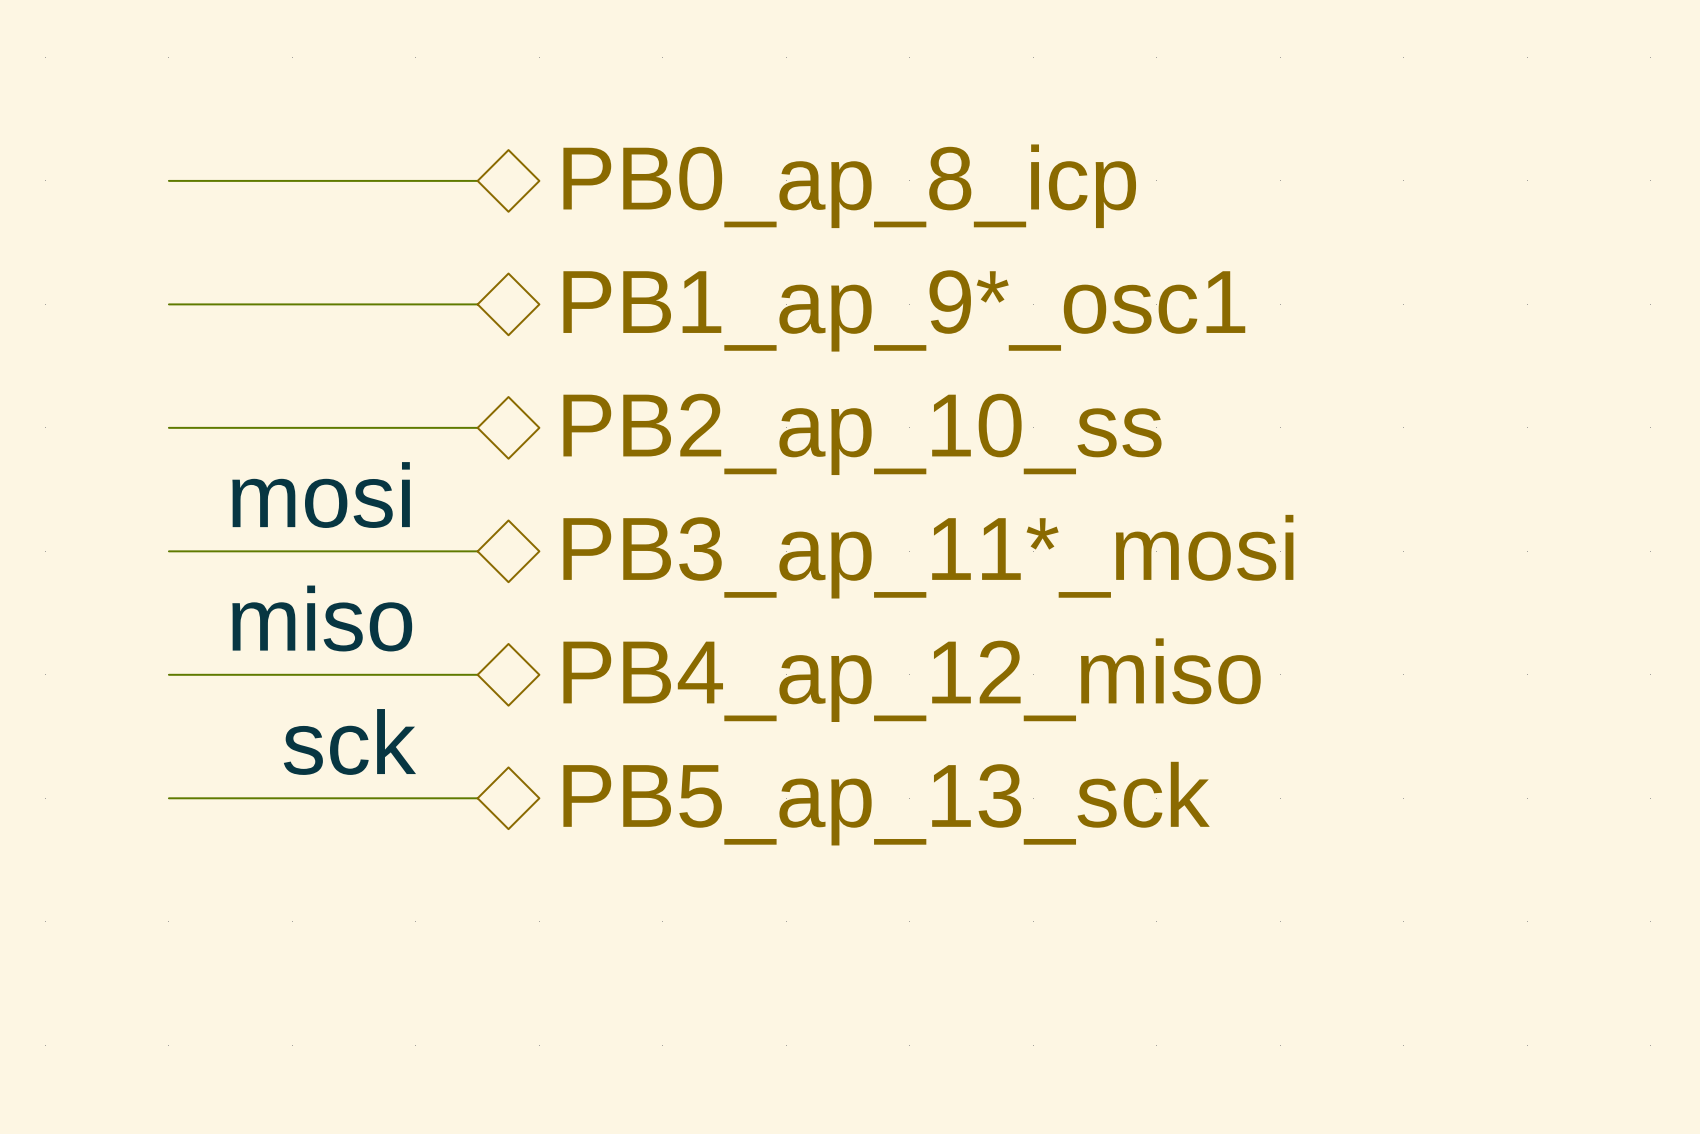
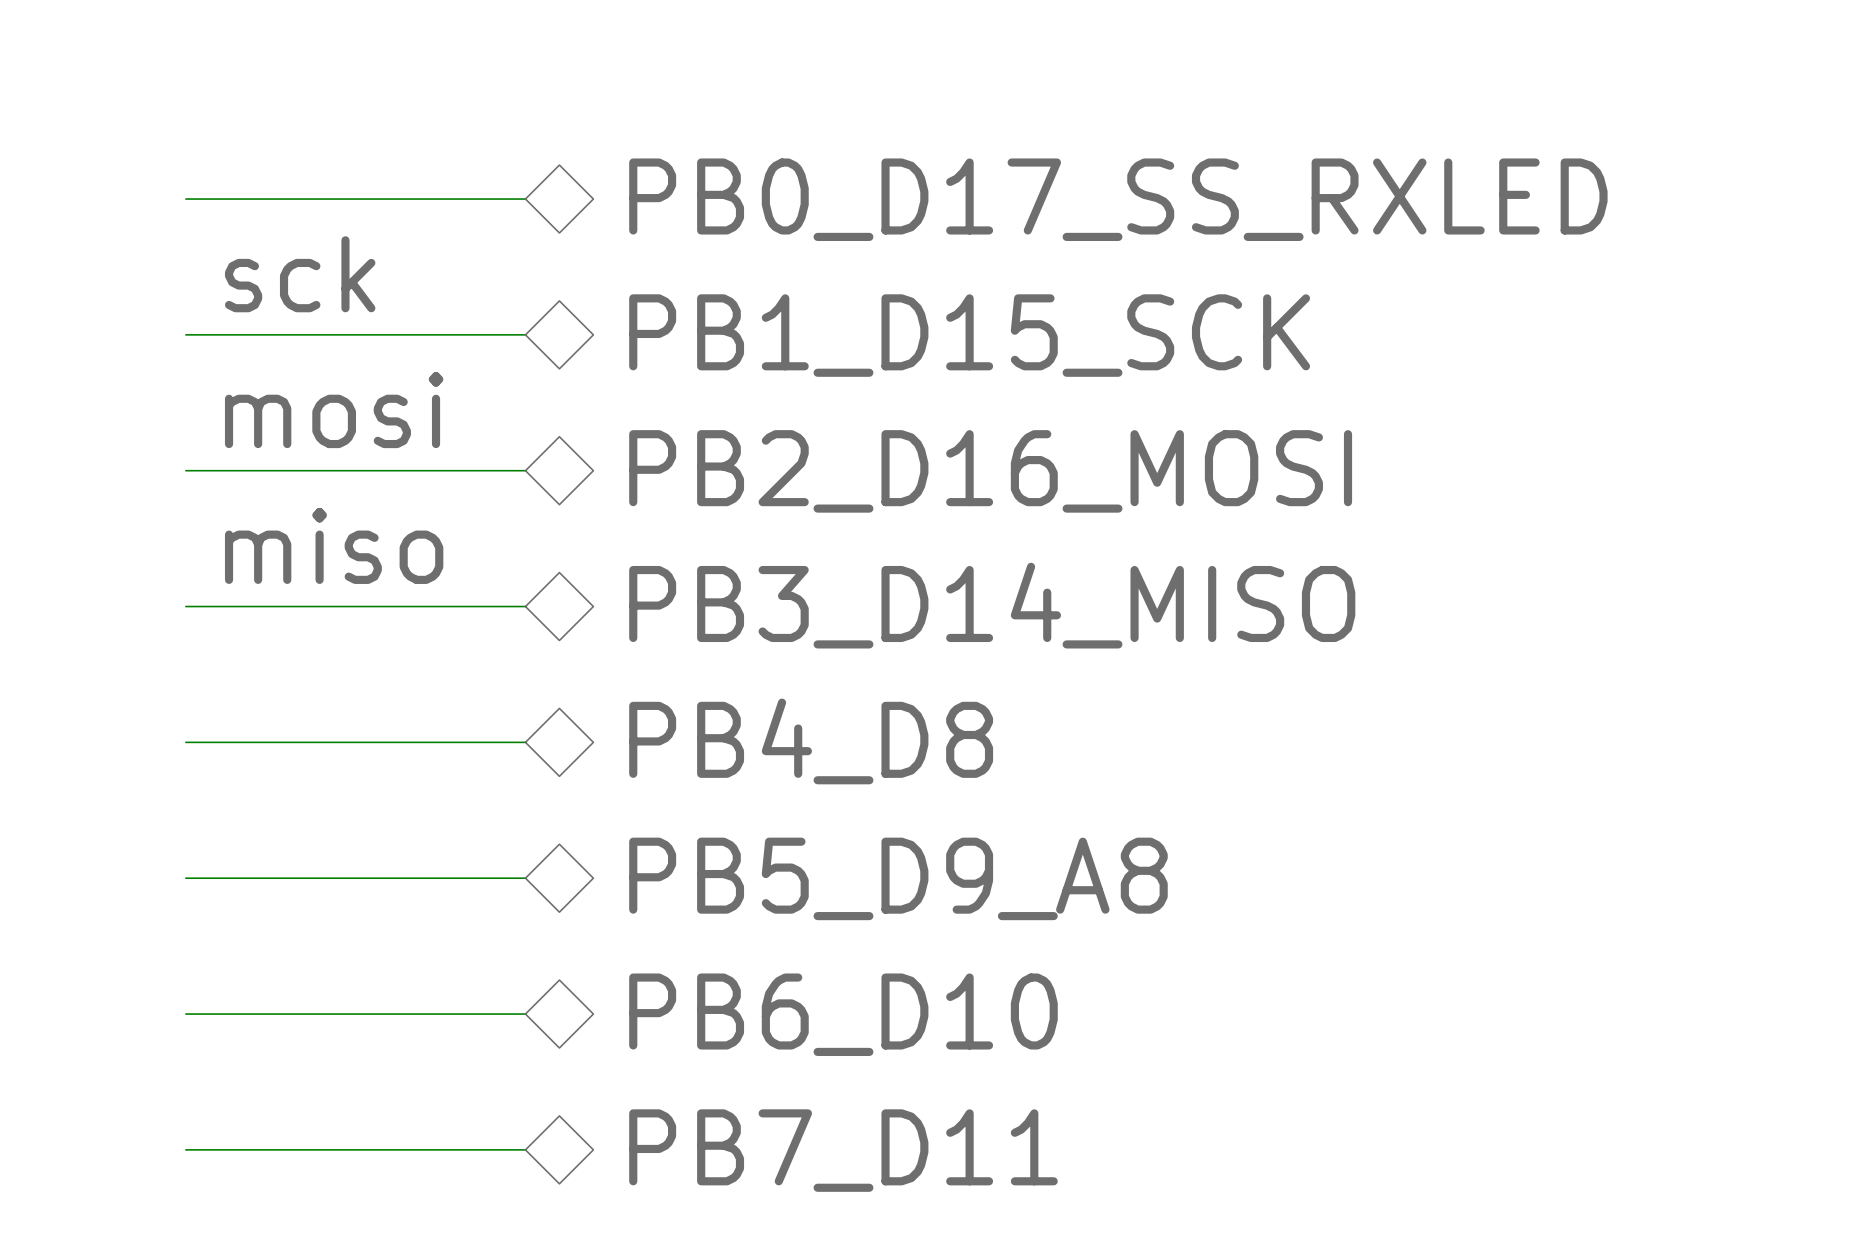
hierarchical label: PB0_ap_8_icp (849, 186) -> PB0_D17_SS_RXLED (1118, 199)
hierarchical label: PB1_ap_9*_osc1 (904, 310) -> PB1_D15_SCK (969, 335)
label: none -> mosi (334, 410)
hierarchical label: PB2_ap_10_ss (862, 434) -> PB2_D16_MOSI (990, 471)
label: mosi (321, 495) -> miso (334, 545)
hierarchical label: PB3_ap_11*_mosi (928, 556) -> PB3_D14_MISO (992, 605)
label: miso (322, 618) -> none
hierarchical label: PB4_ap_12_miso (912, 680) -> PB4_D8 (811, 741)
label position: sck (349, 741) -> sck (300, 274)
hierarchical label: PB5_ap_13_sck (886, 803) -> PB5_D9_A8 (898, 878)
wire: none -> (185, 1014) (525, 1014)
hierarchical label: none -> PB6_D10 (843, 1014)
wire: none -> (185, 1149) (525, 1149)
hierarchical label: none -> PB7_D11 (843, 1150)

